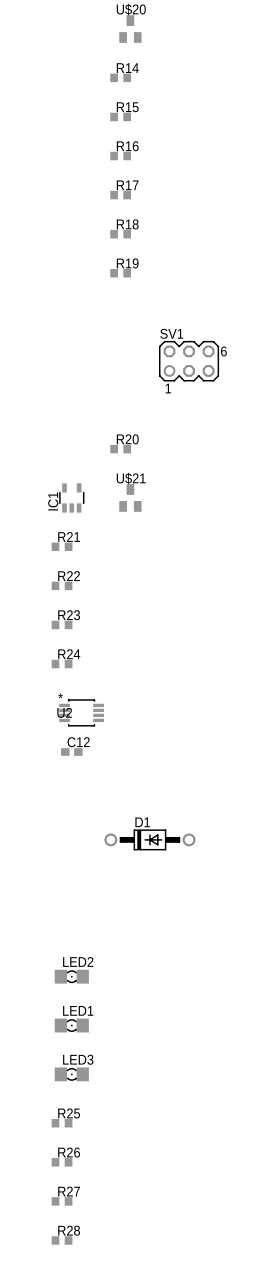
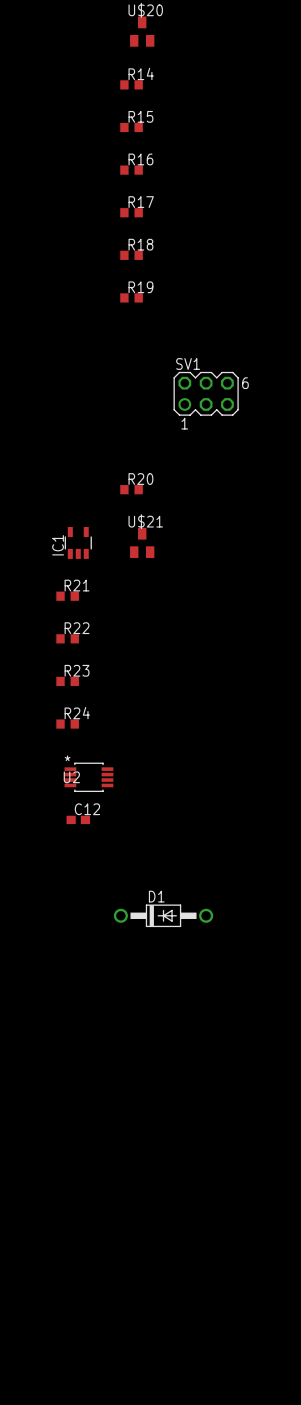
LED2: (71, 976) -> none
LED1: (71, 1025) -> none
LED3: (71, 1074) -> none
R25: (62, 1123) -> none
R26: (62, 1162) -> none
R27: (62, 1201) -> none
R28: (62, 1240) -> none

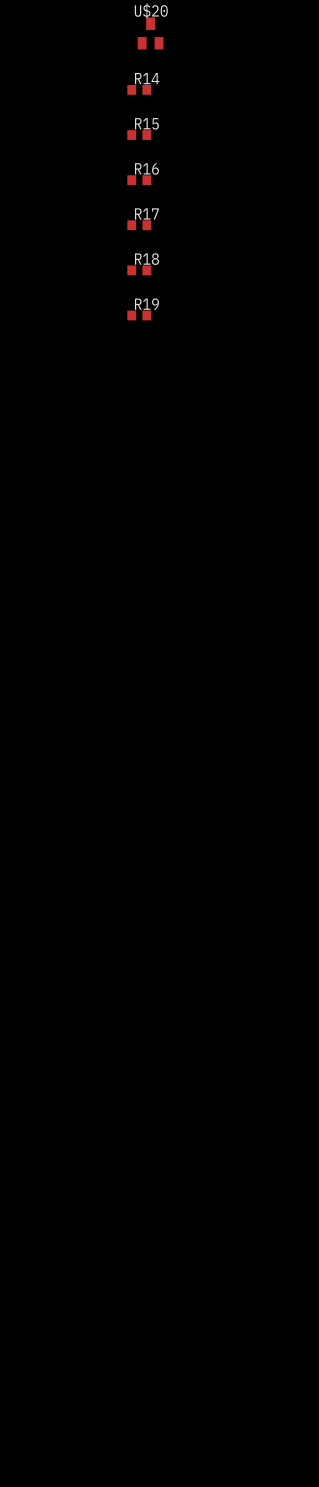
SV1: (206, 393) -> none
R20: (131, 489) -> none
IC1: (78, 542) -> none
U$21: (142, 542) -> none
R21: (67, 596) -> none
R22: (67, 638) -> none
R23: (67, 681) -> none
R24: (67, 724) -> none
U2: (88, 777) -> none
C12: (78, 819) -> none
D1: (163, 915) -> none

